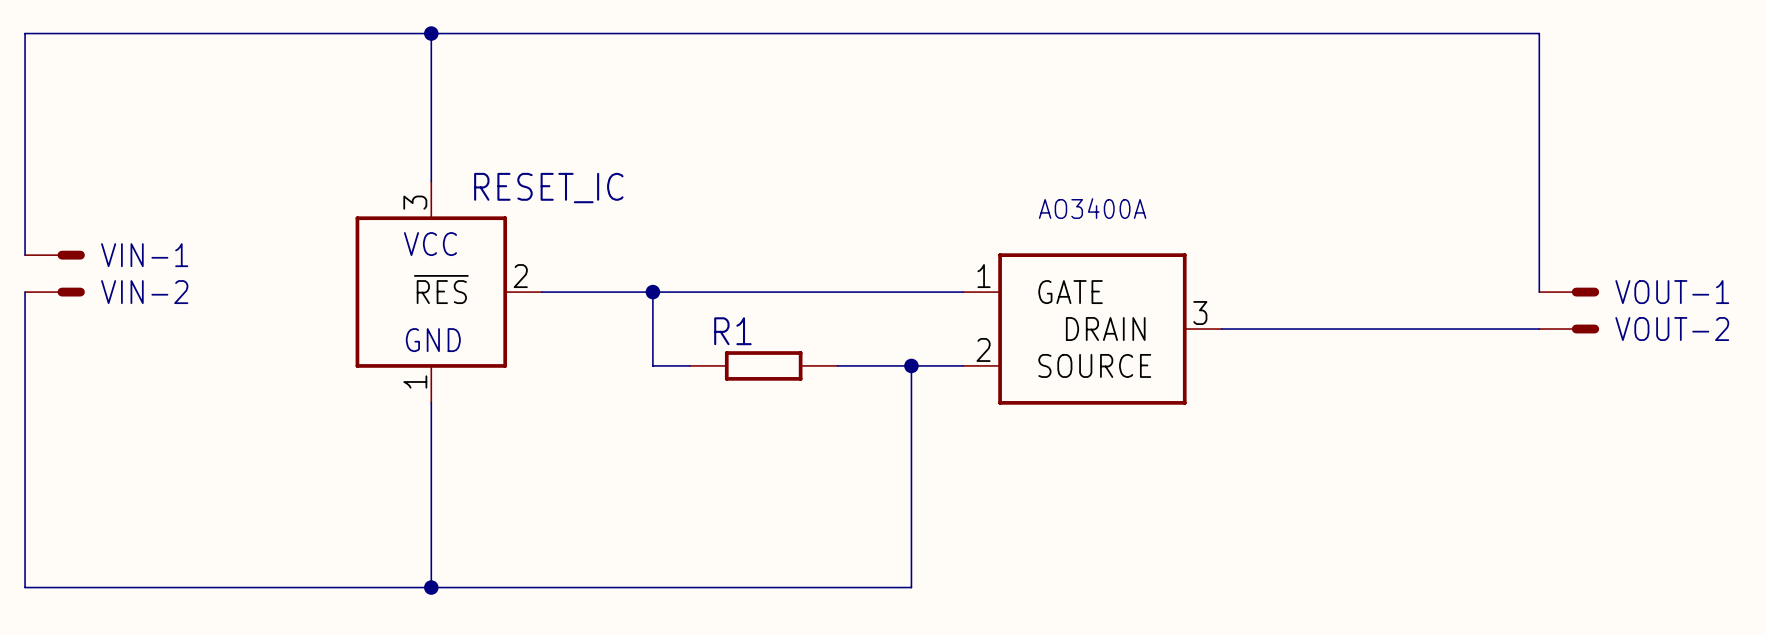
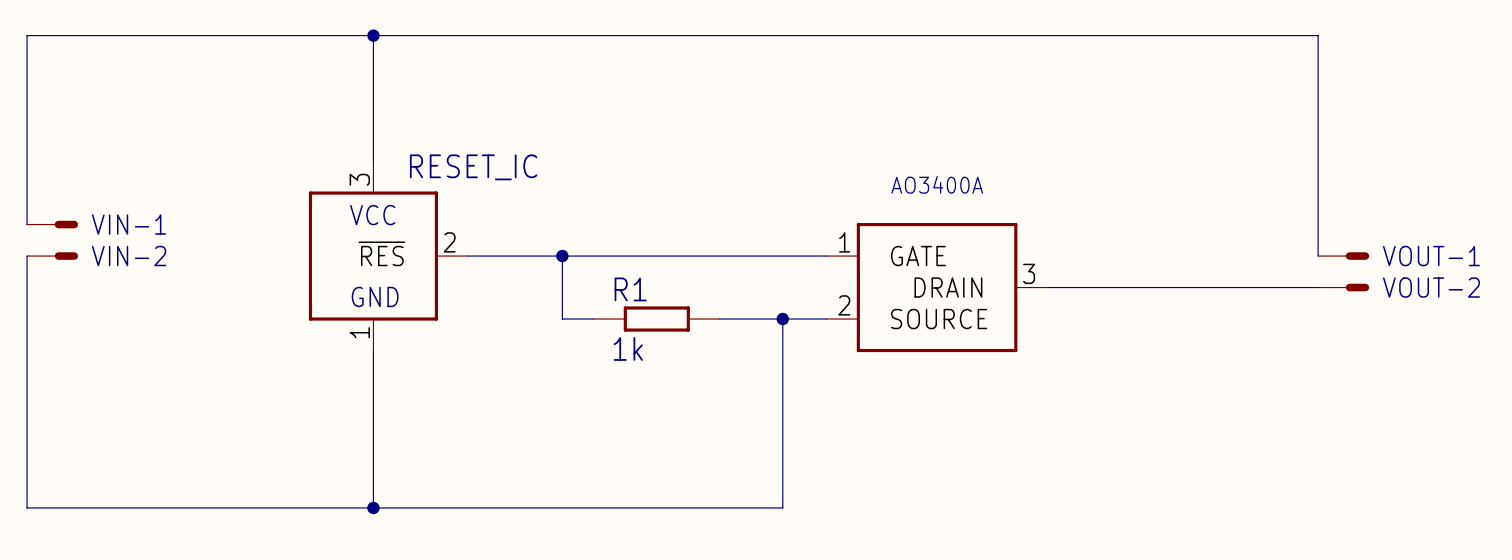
R1 value: none -> 1k (628, 348)

